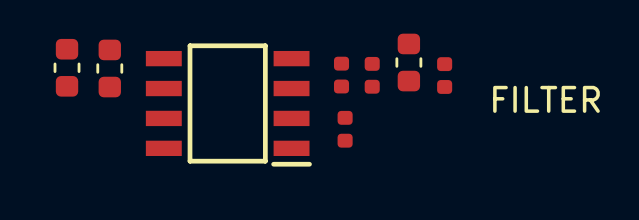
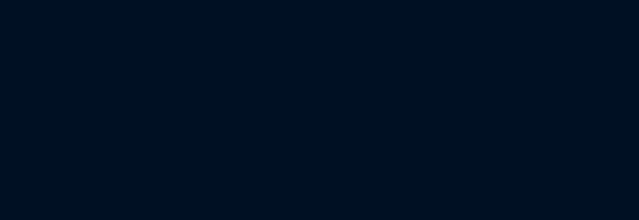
part: (408, 62) -> none
part: (67, 67) -> none
part: (109, 68) -> none
part: (341, 75) -> none
part: (372, 75) -> none
part: (444, 75) -> none
text: FILTER (546, 99) -> none
part: (228, 105) -> none
part: (345, 129) -> none

